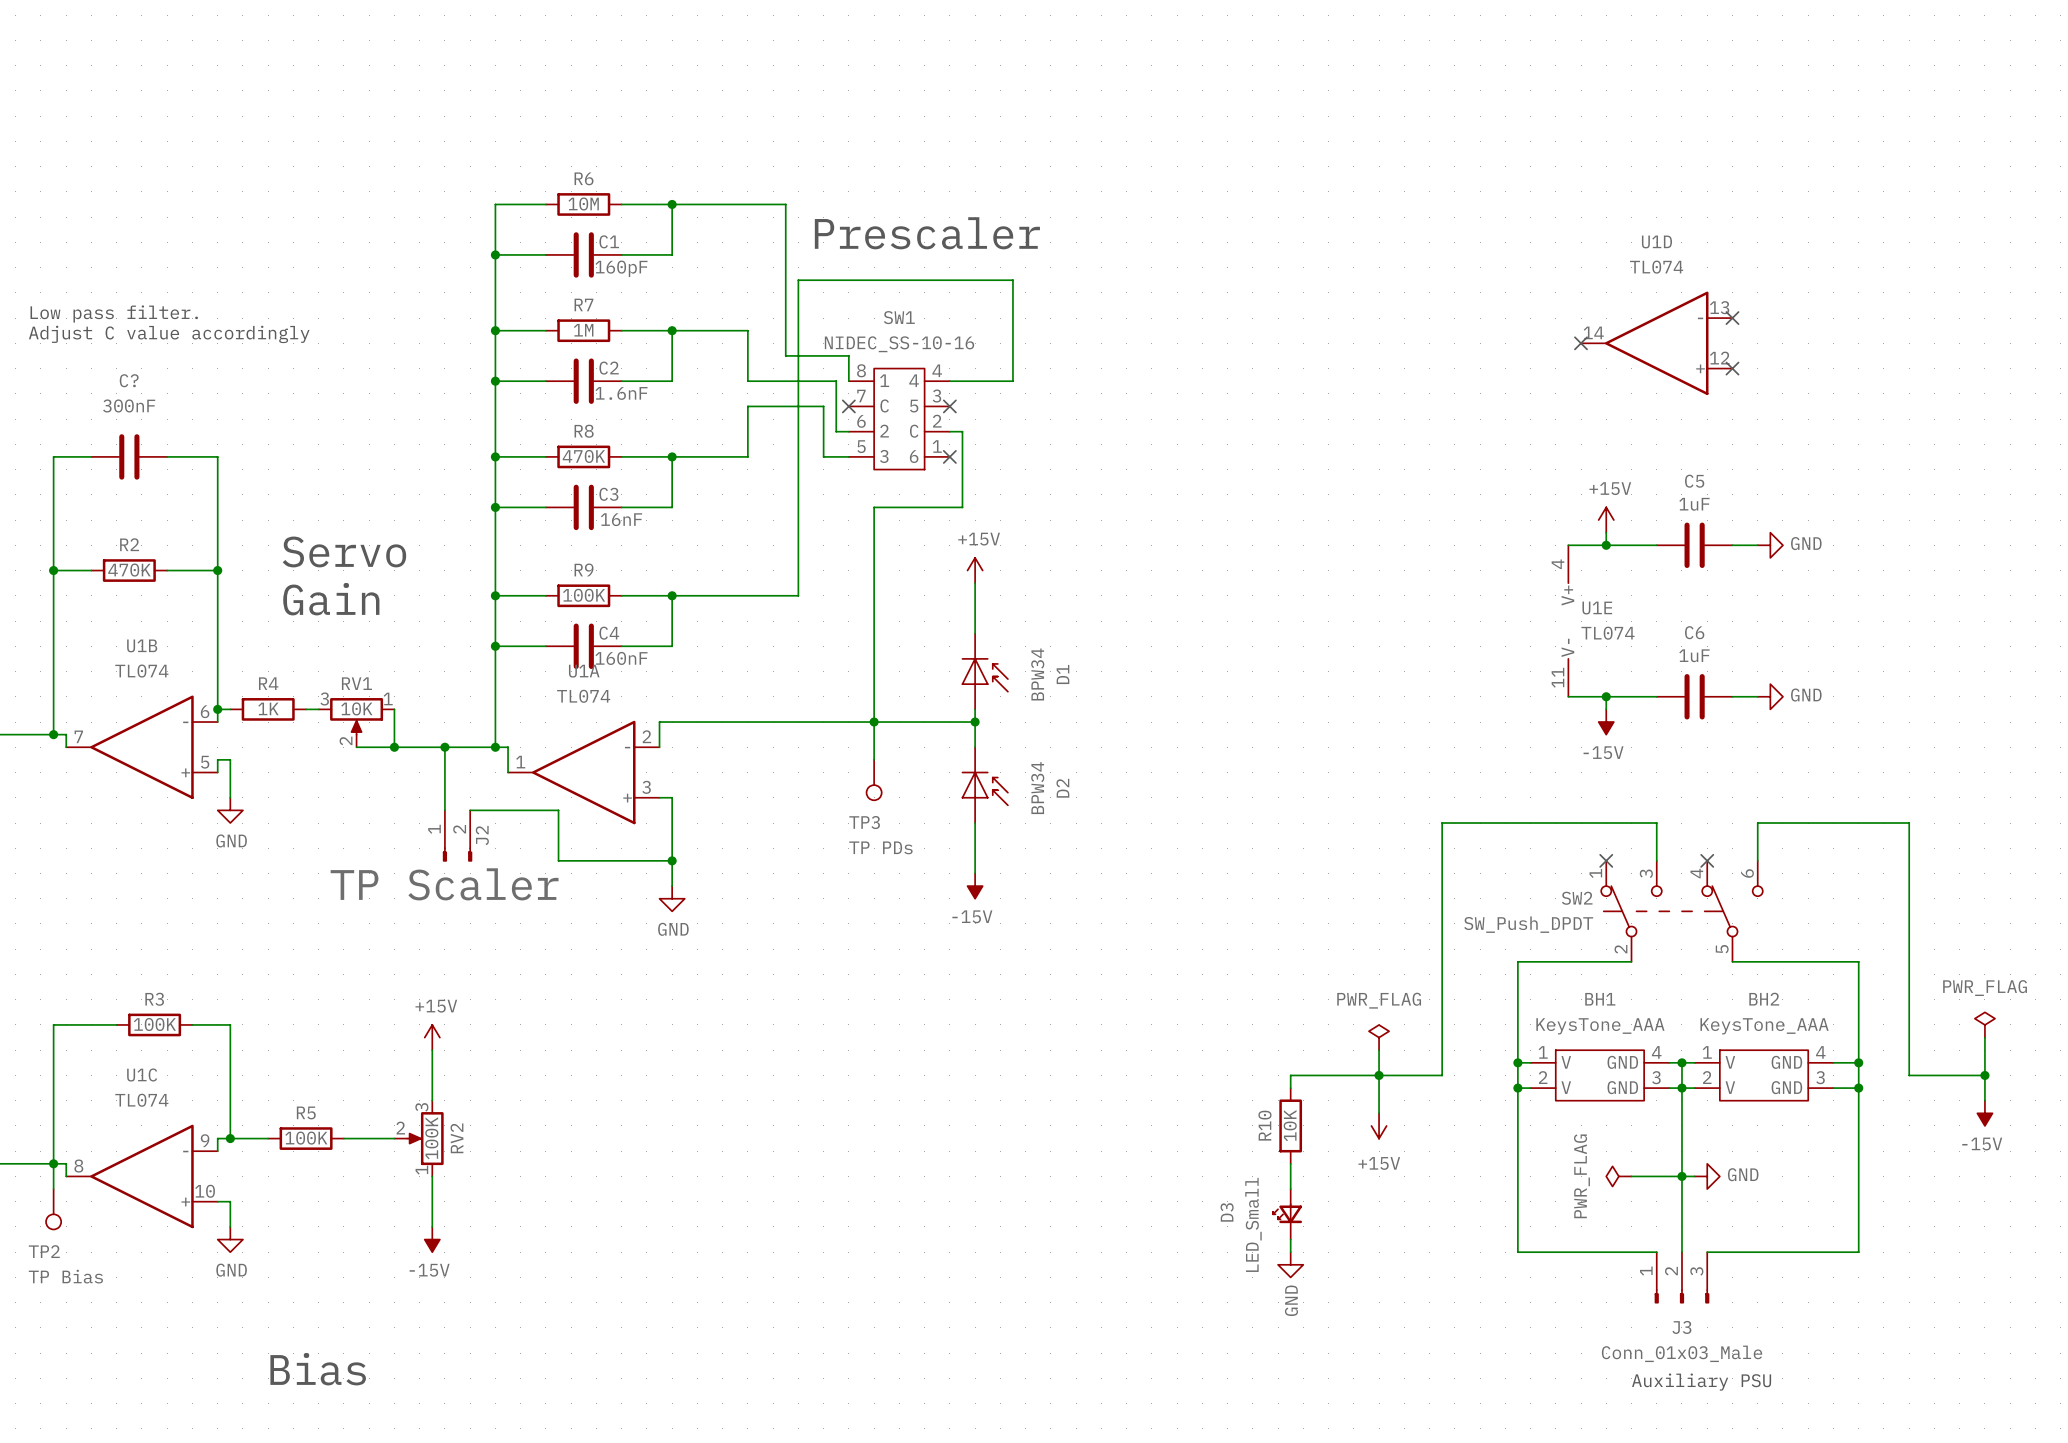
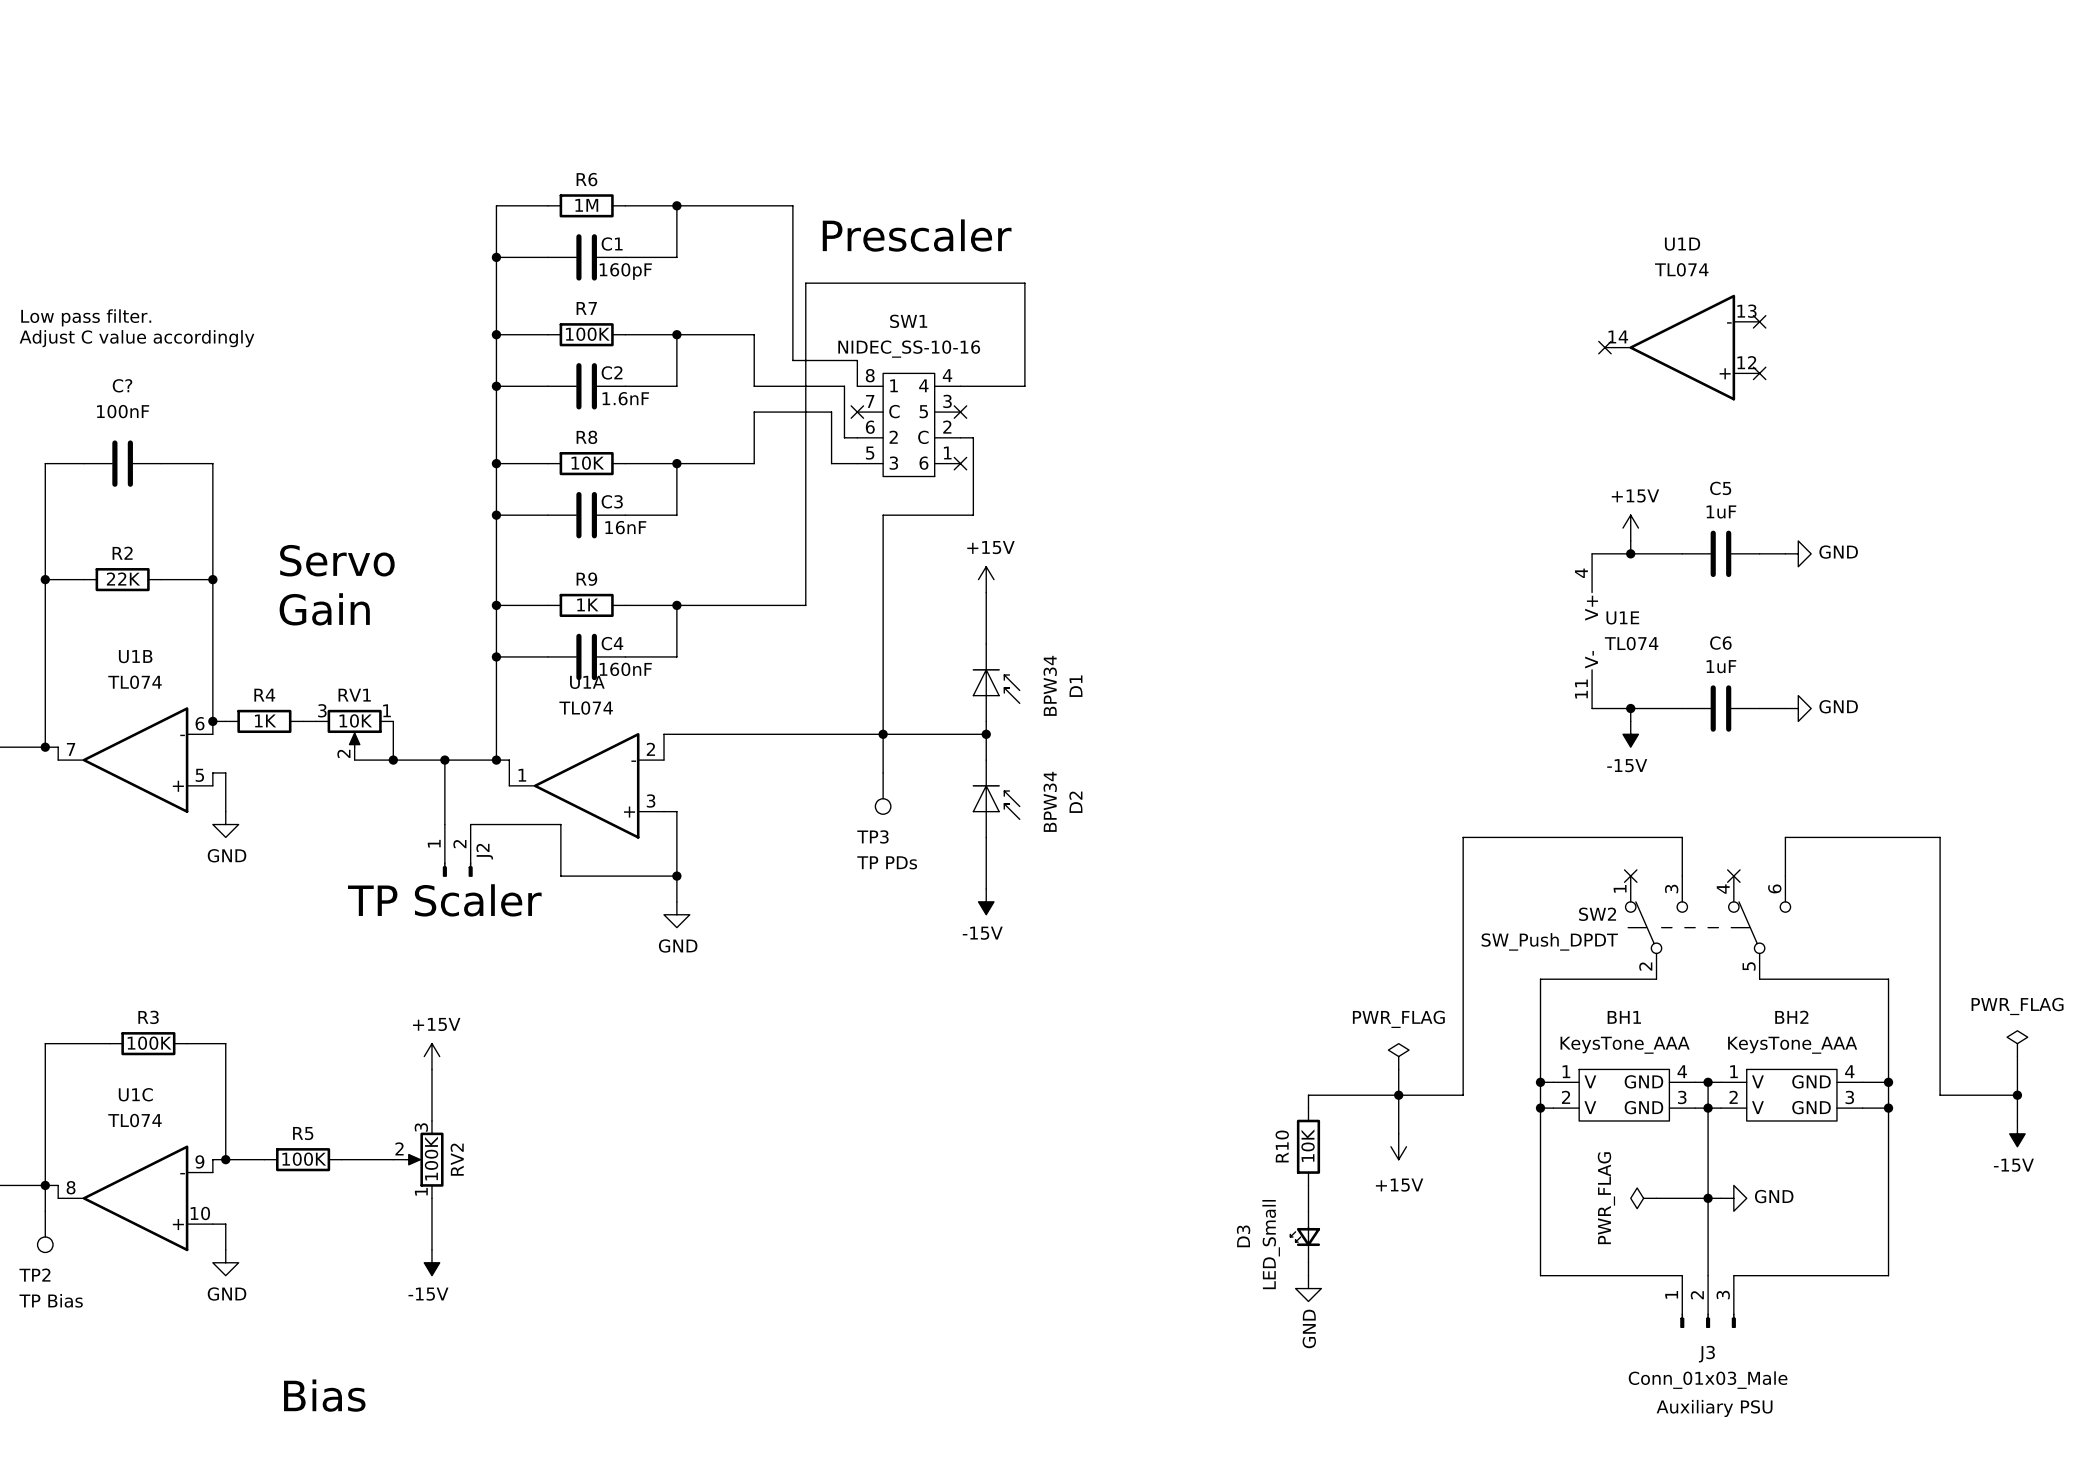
R6 value: 10M (583, 203) -> 1M (586, 205)
R7 value: 1M (583, 330) -> 100K (587, 334)
C? value: 300nF (129, 405) -> 100nF (123, 411)
R8 value: 470K (583, 456) -> 10K (587, 463)
R2 value: 470K (129, 570) -> 22K (123, 579)
R9 value: 100K (584, 595) -> 1K (587, 604)

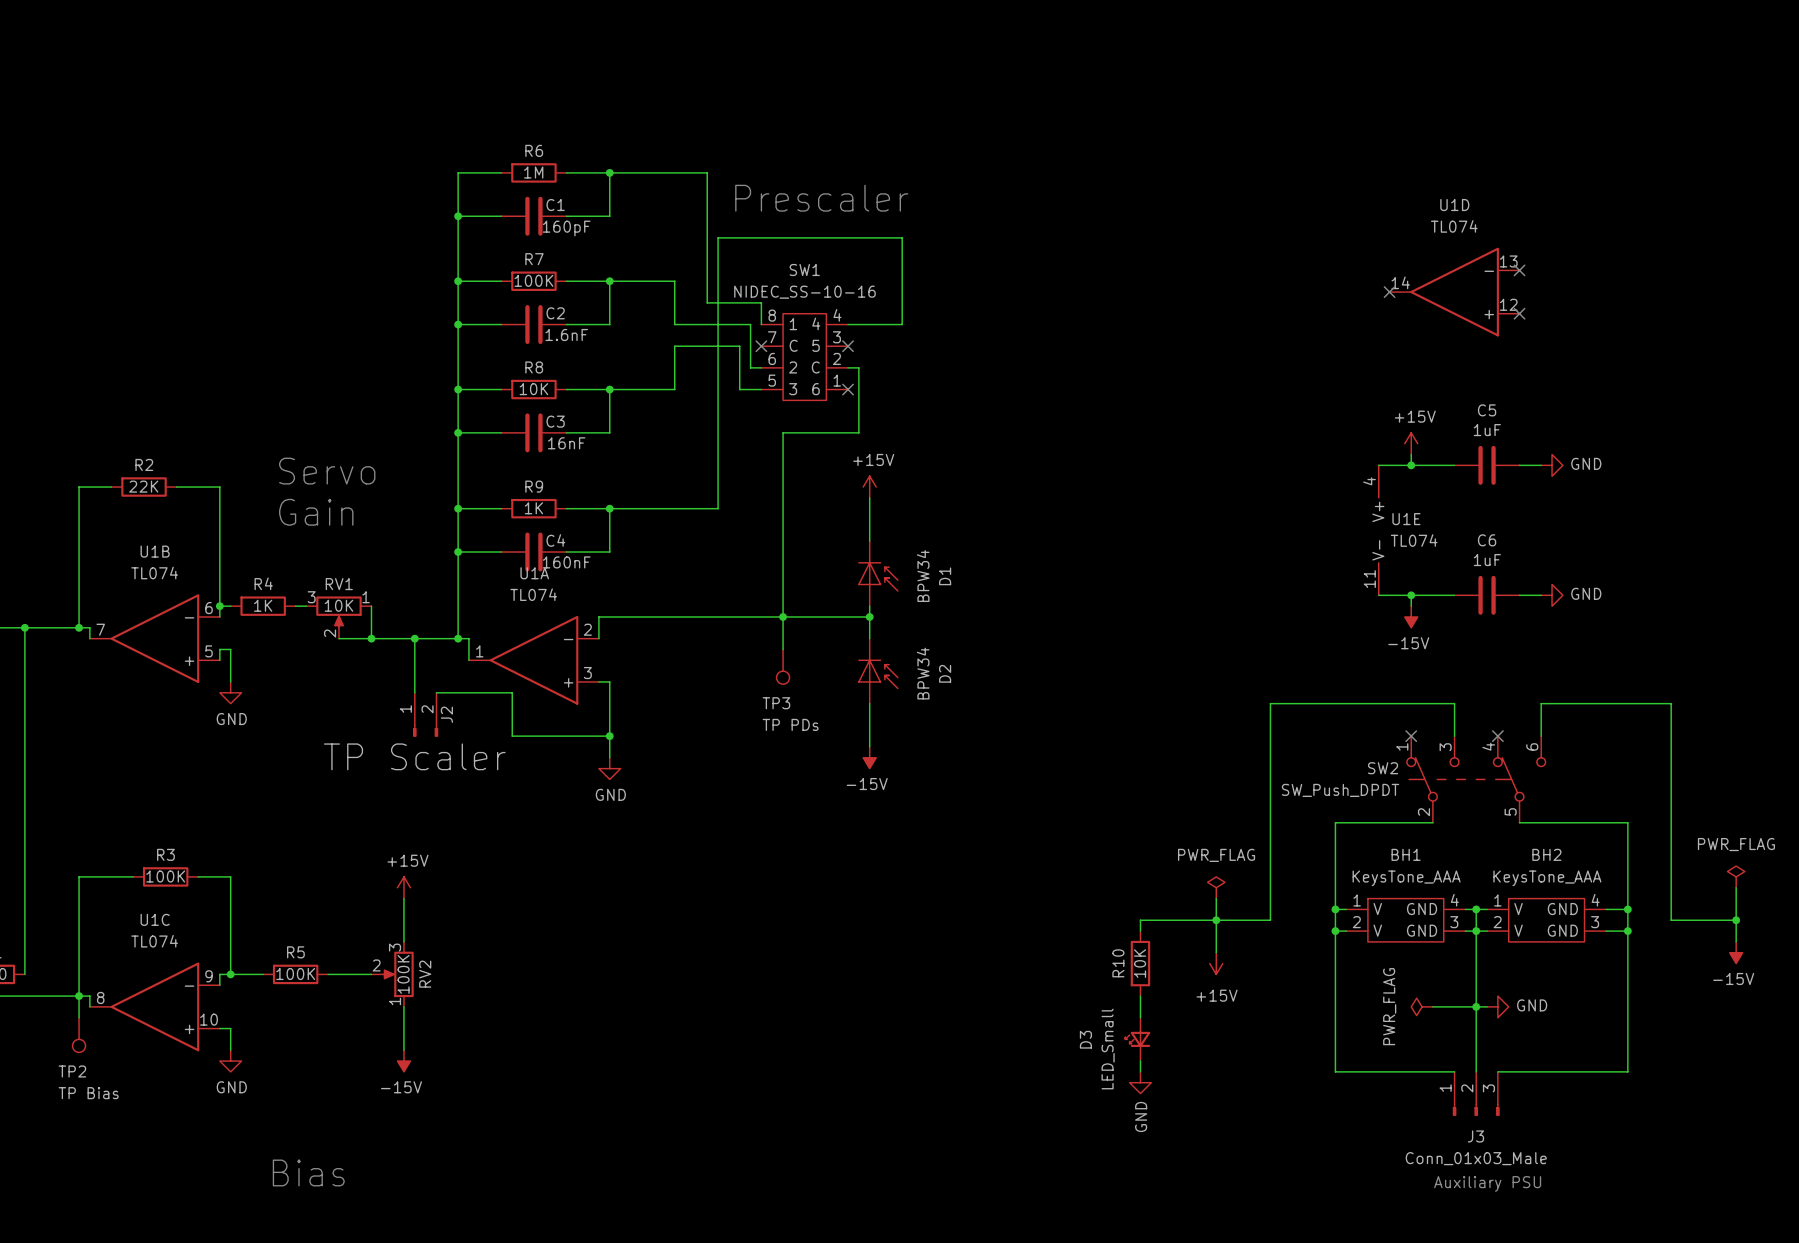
text: Low pass filter. (86, 317) -> none
text: Adjust C value accordingly (137, 338) -> none
wire: (83, 463) (45, 463) (45, 579) -> none
C?: 100nF (122, 463) -> none
wire: (161, 463) (212, 463) (212, 579) -> none
junction: (45, 579) -> none
junction: (212, 579) -> none

